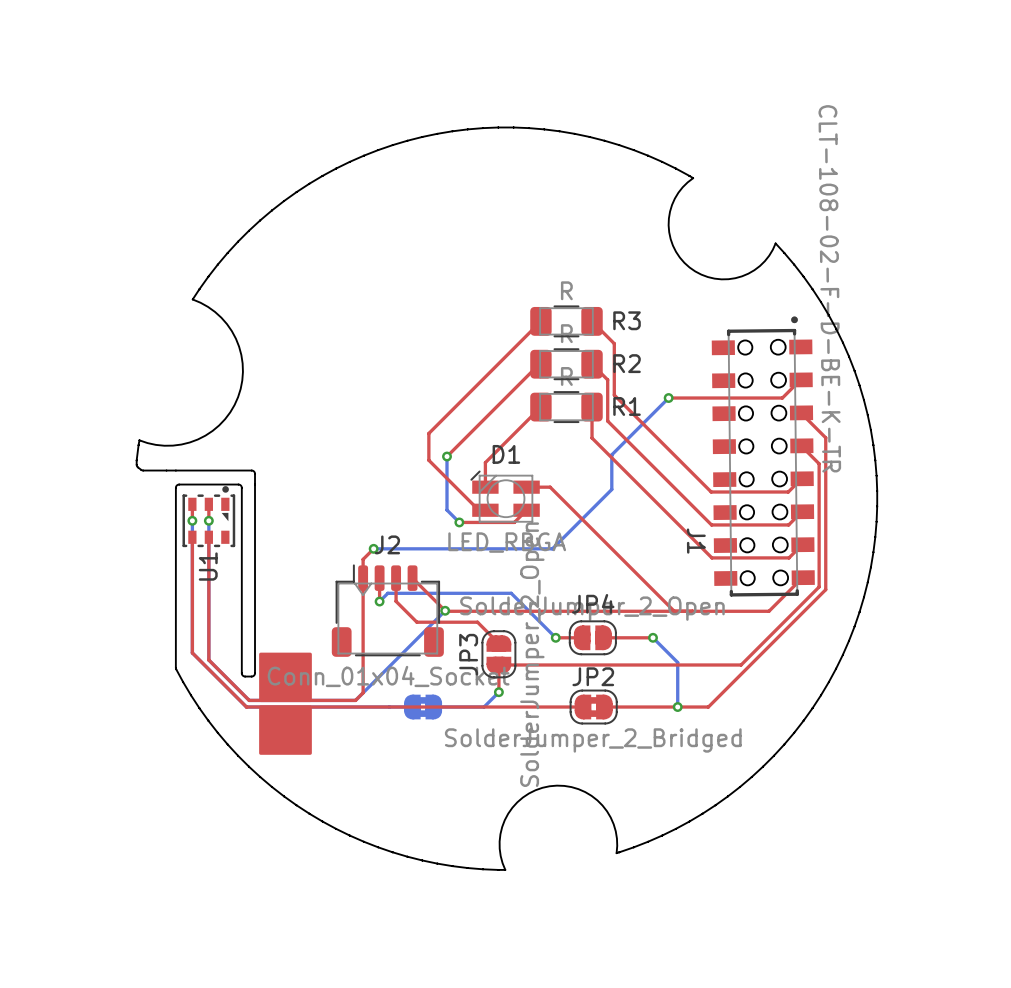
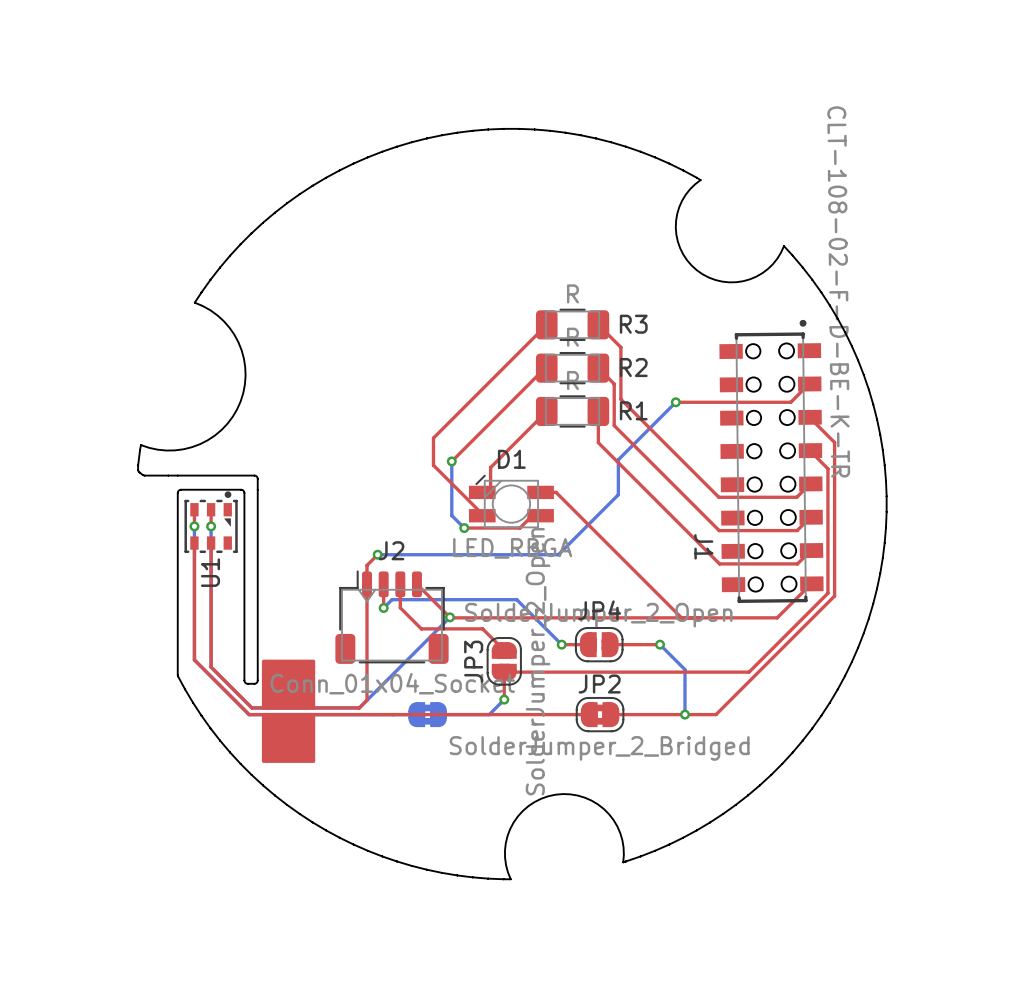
D1 footprint: [470, 470, 540, 523] -> [468, 474, 554, 529]

